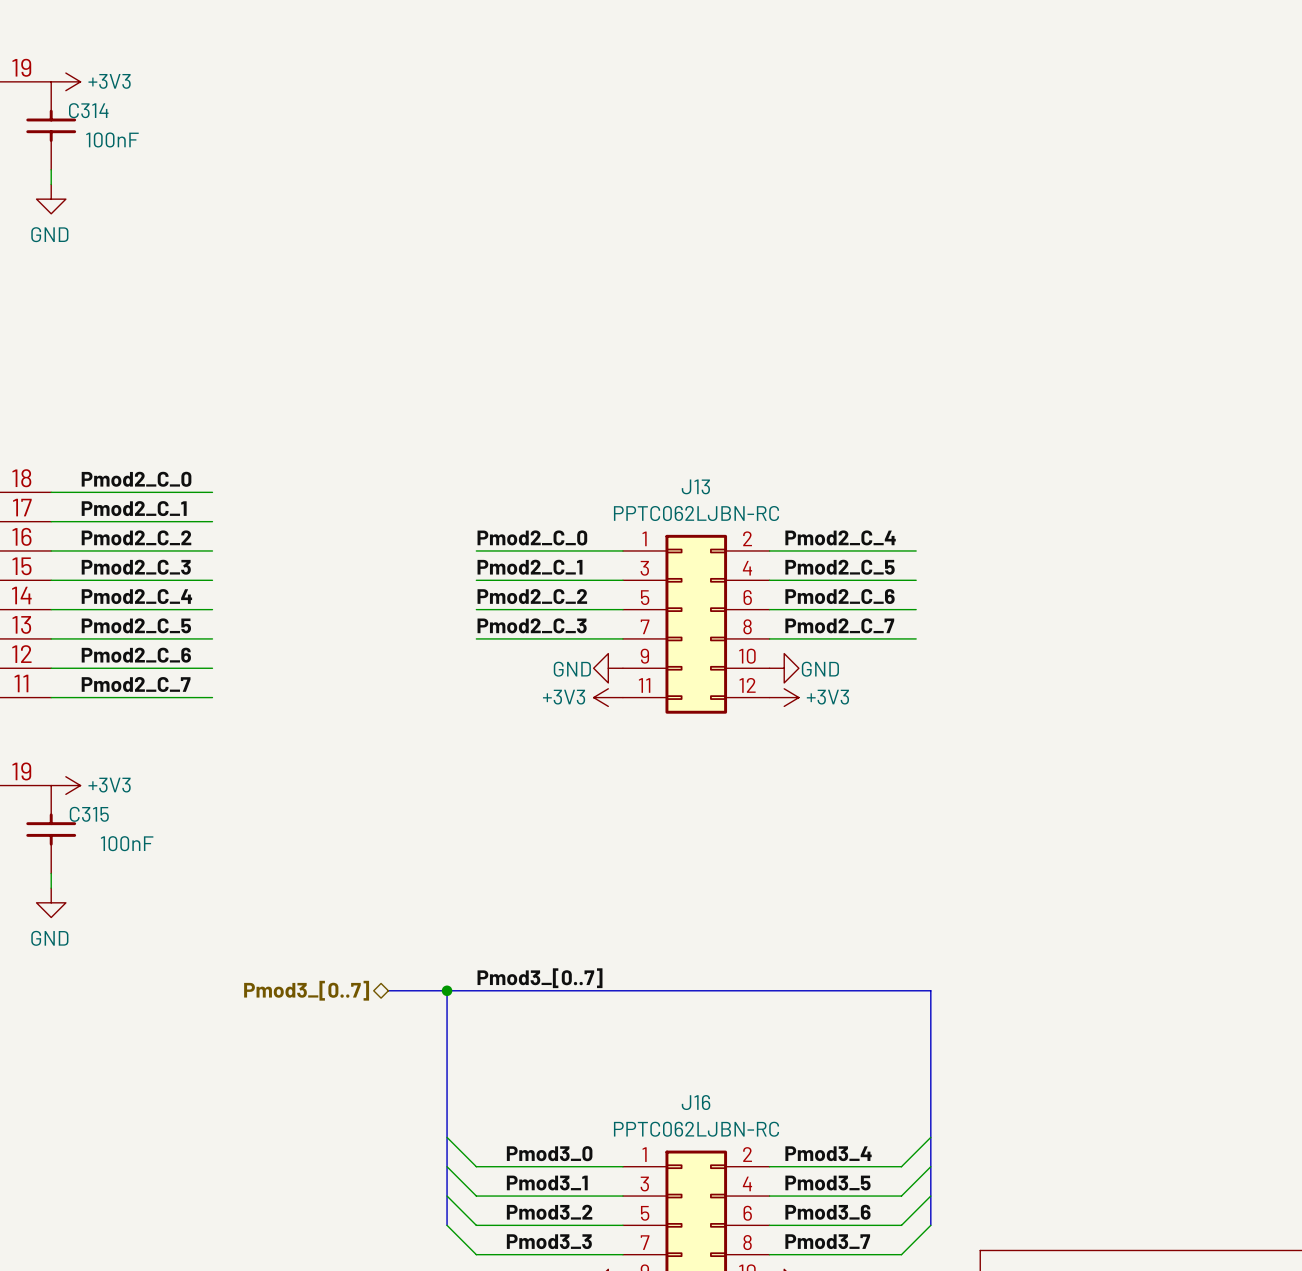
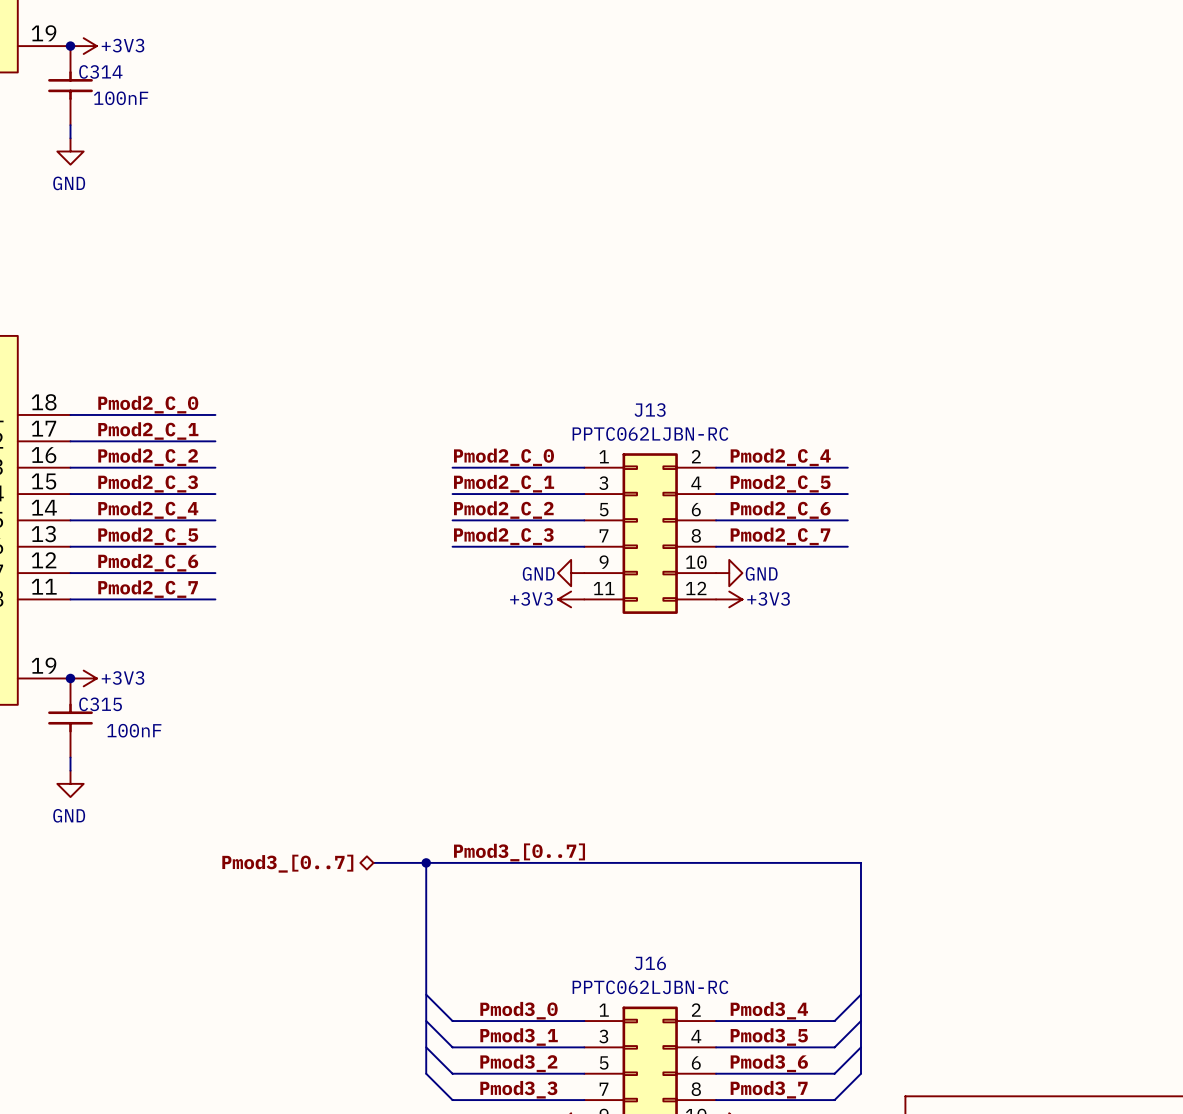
junction: none -> (70, 46)
junction: none -> (70, 678)

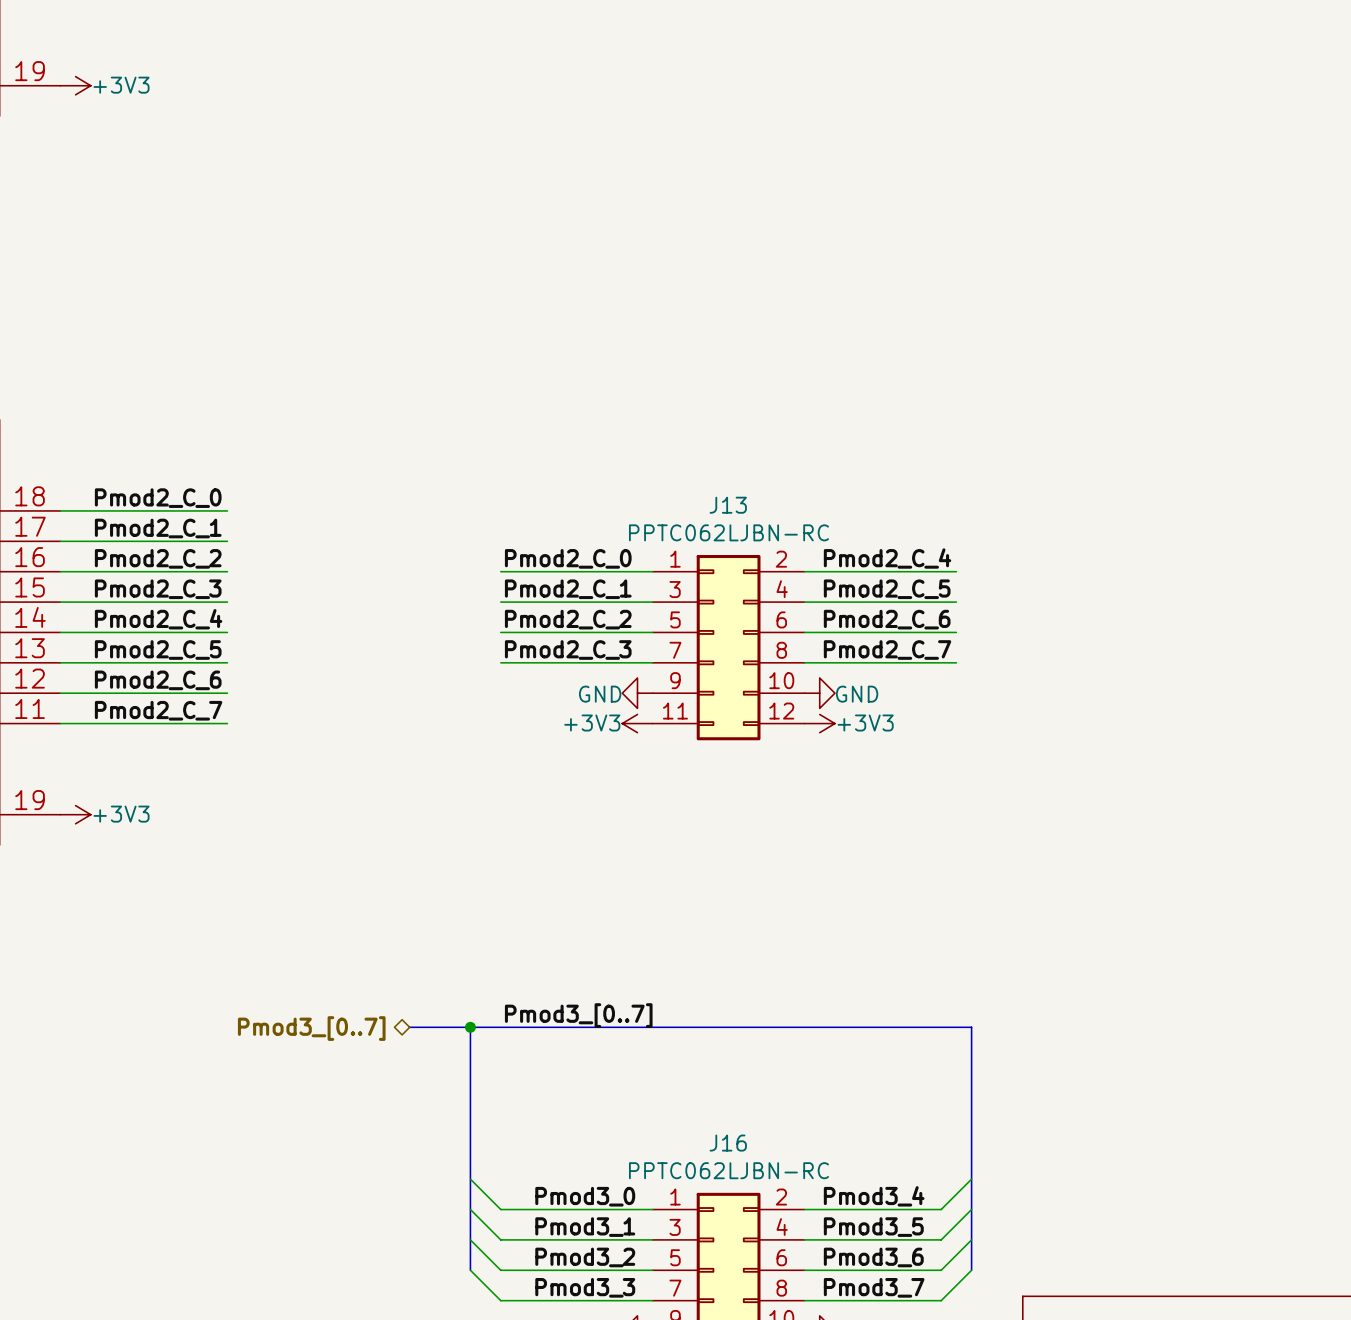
junction: (70, 46) -> none
C314: (70, 85) -> none
wire: (70, 125) (70, 138) -> none
power symbol: GND (70, 151) -> none
junction: (70, 678) -> none
C315: (70, 718) -> none
wire: (70, 757) (70, 770) -> none
power symbol: GND (70, 783) -> none

